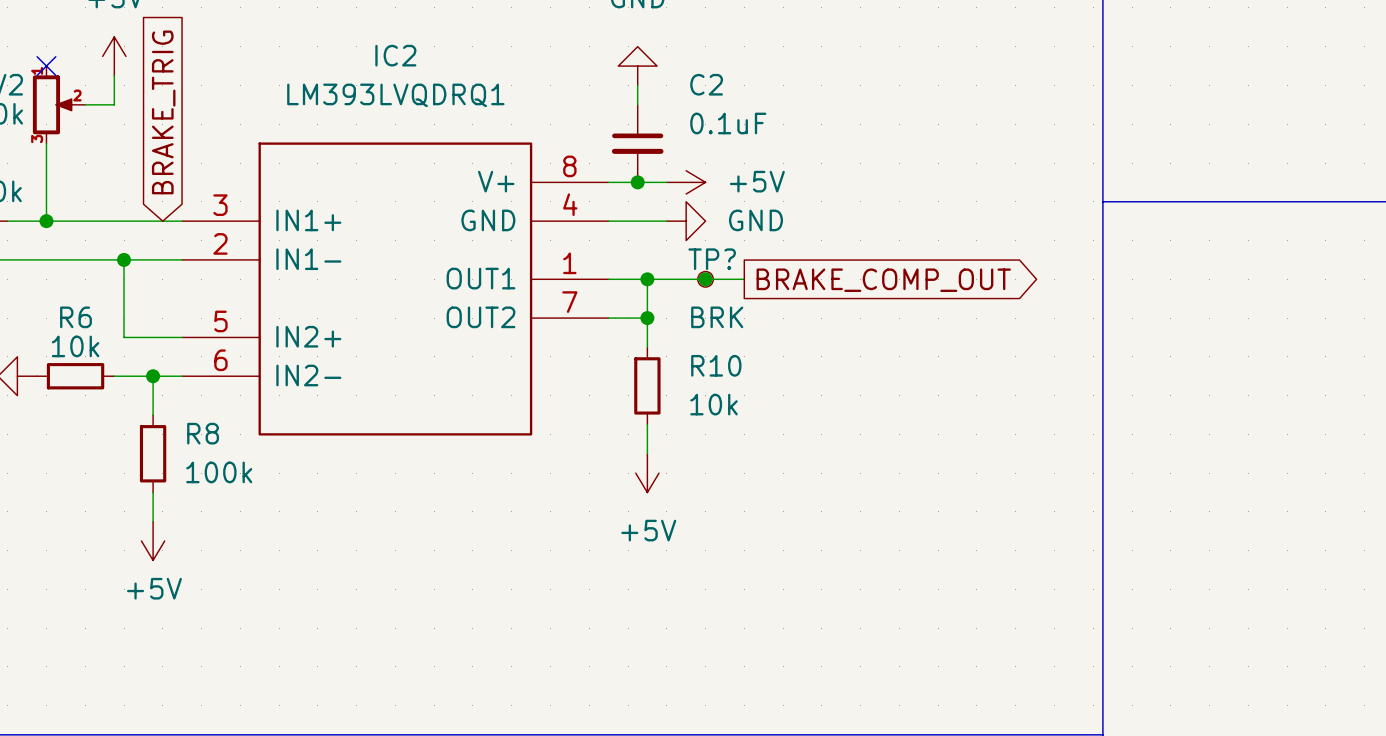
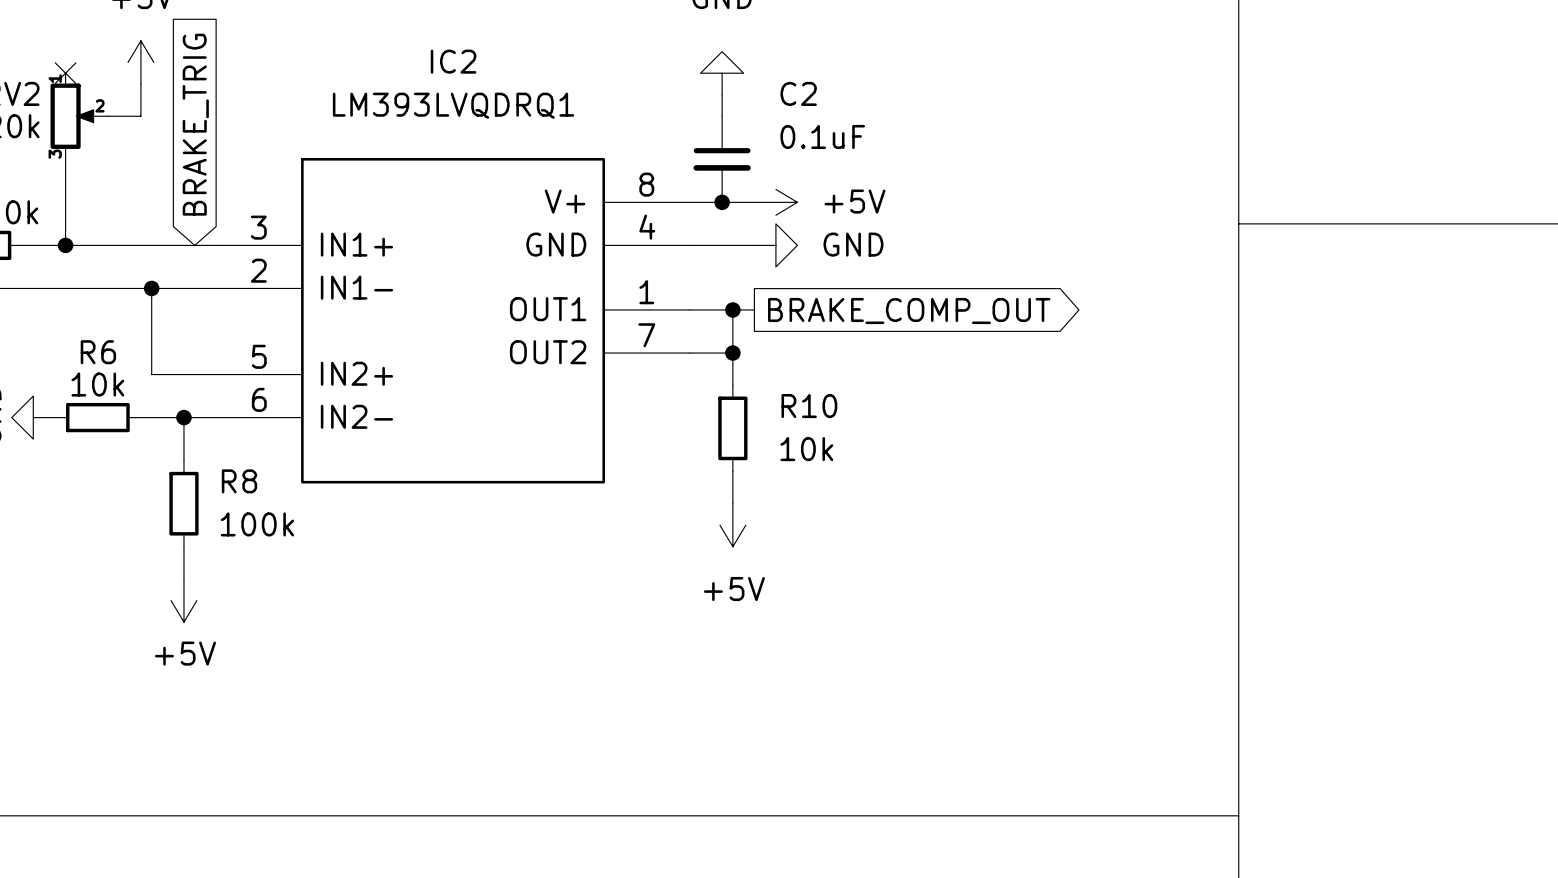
wire: (666, 279) (744, 279) -> none
junction: (705, 279) -> none
TP?: BRK (705, 279) -> none
global label position: BRAKE_COMP_OUT (883, 280) -> BRAKE_COMP_OUT (909, 311)

